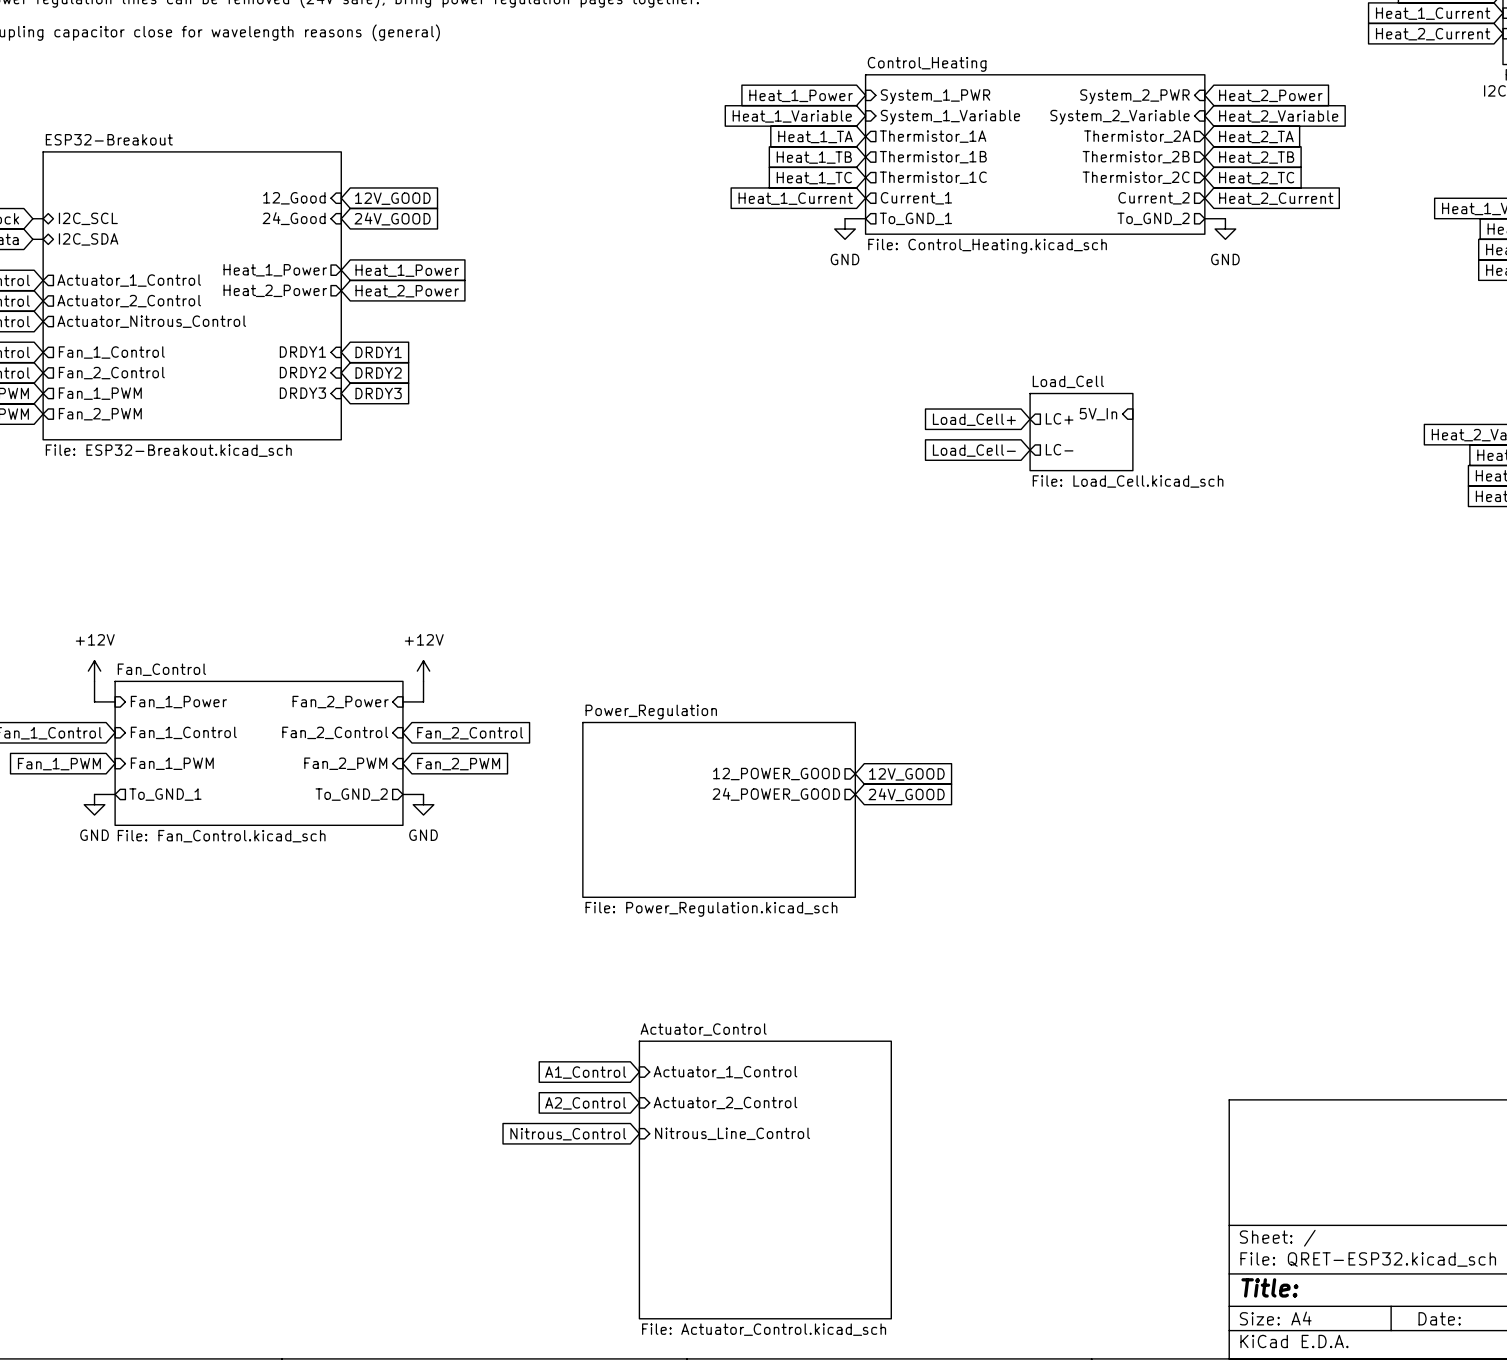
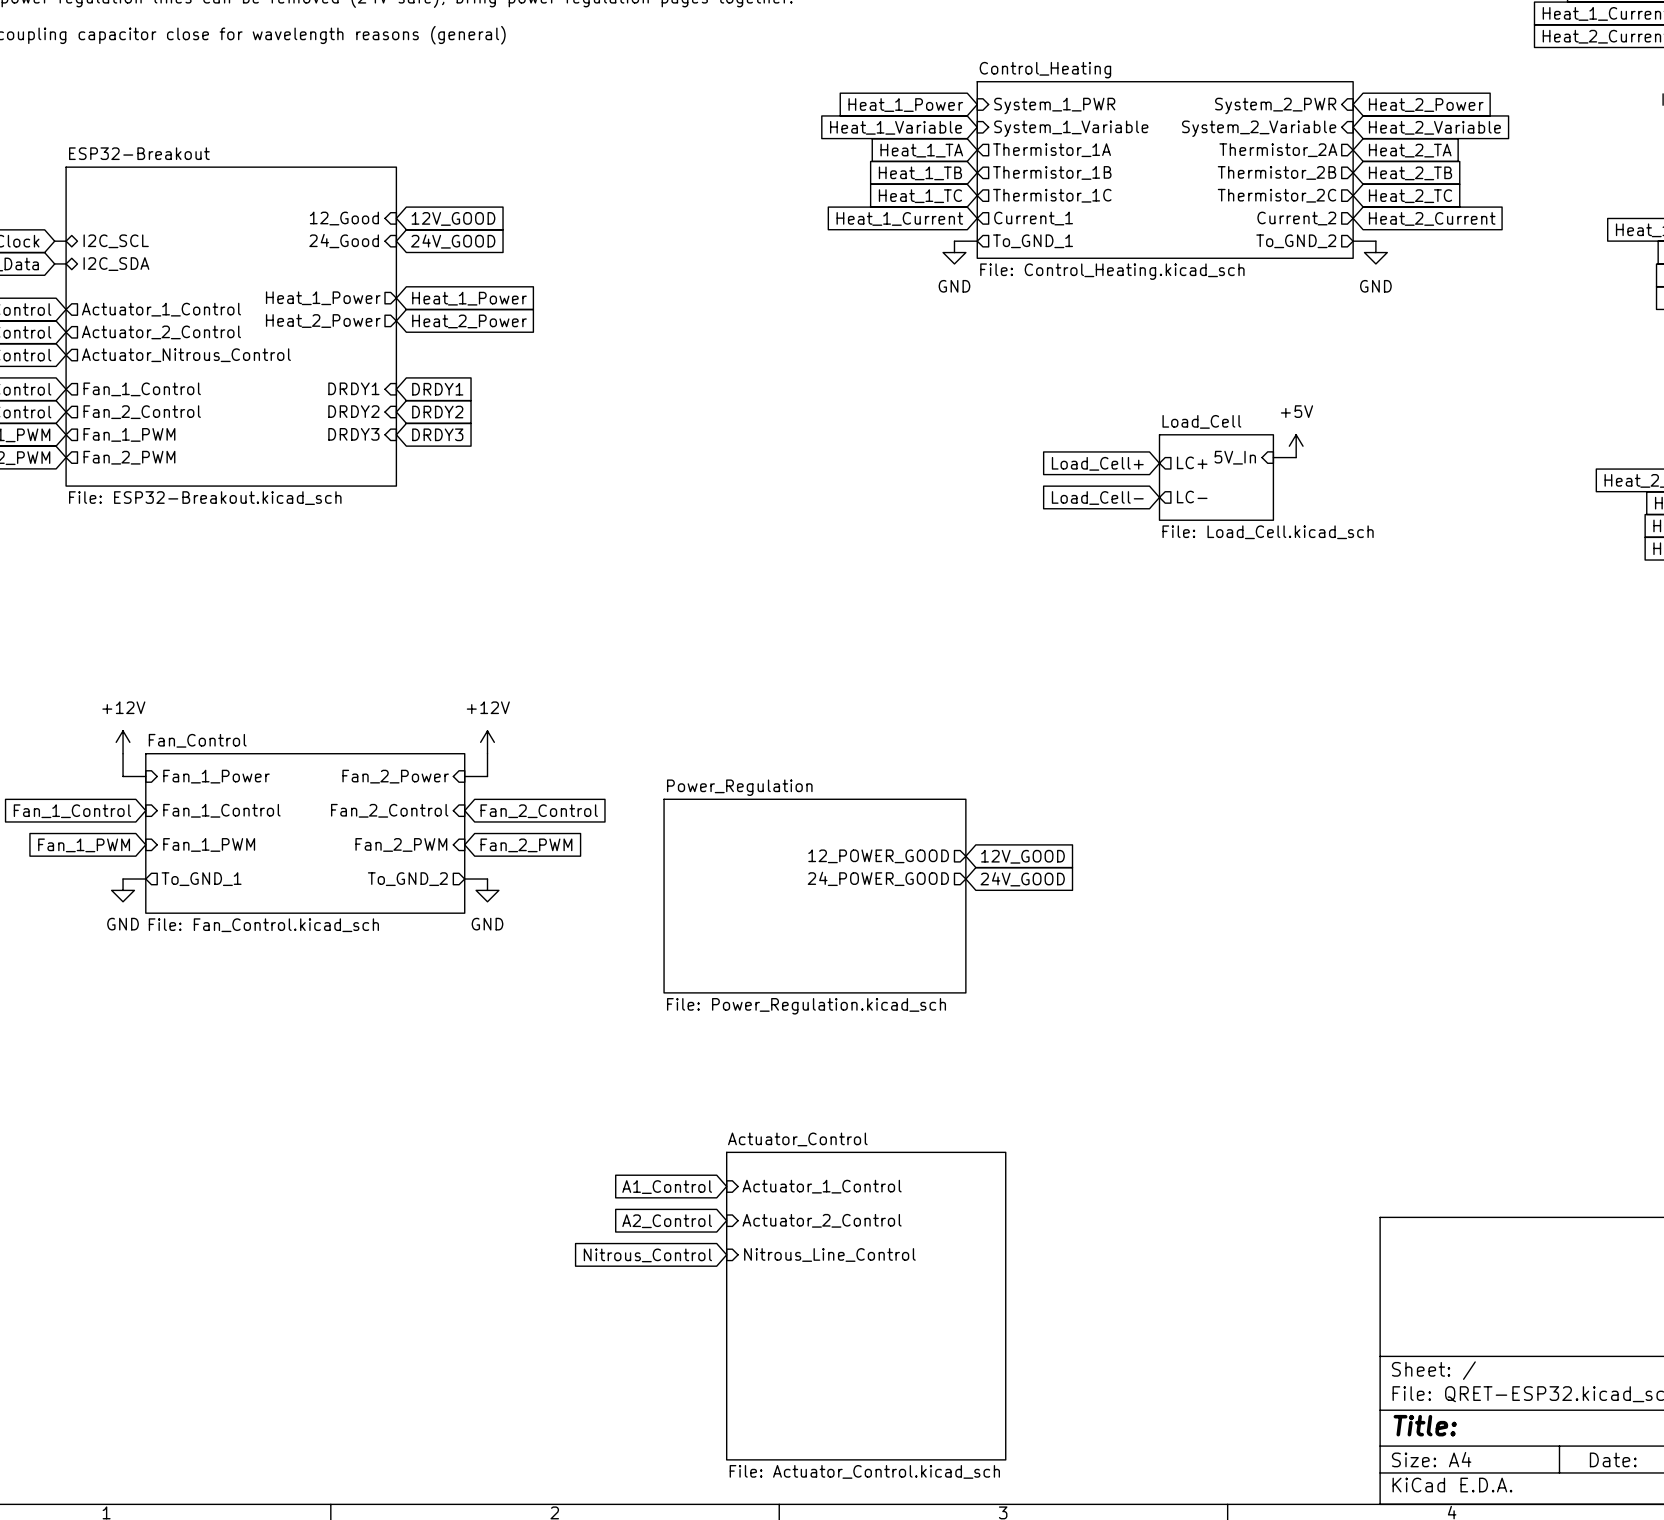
power symbol: none -> +5V (1296, 446)
wire: none -> (1273, 457) (1296, 457)

